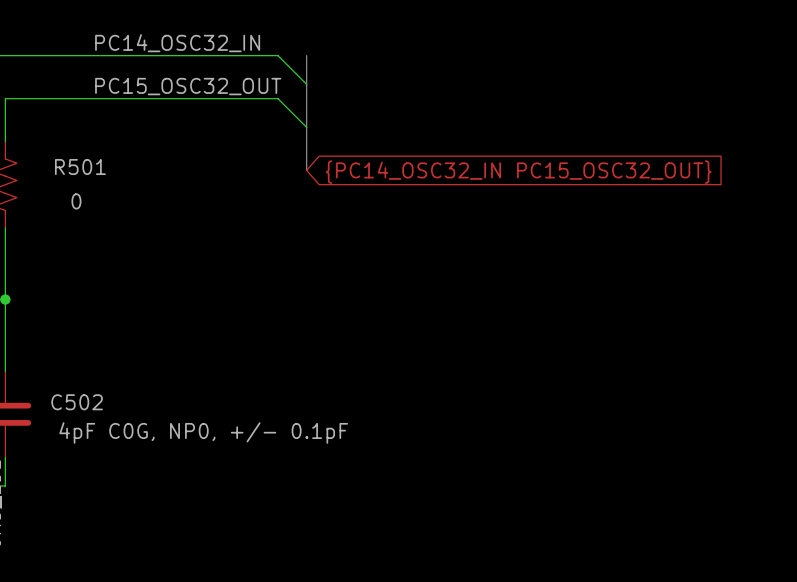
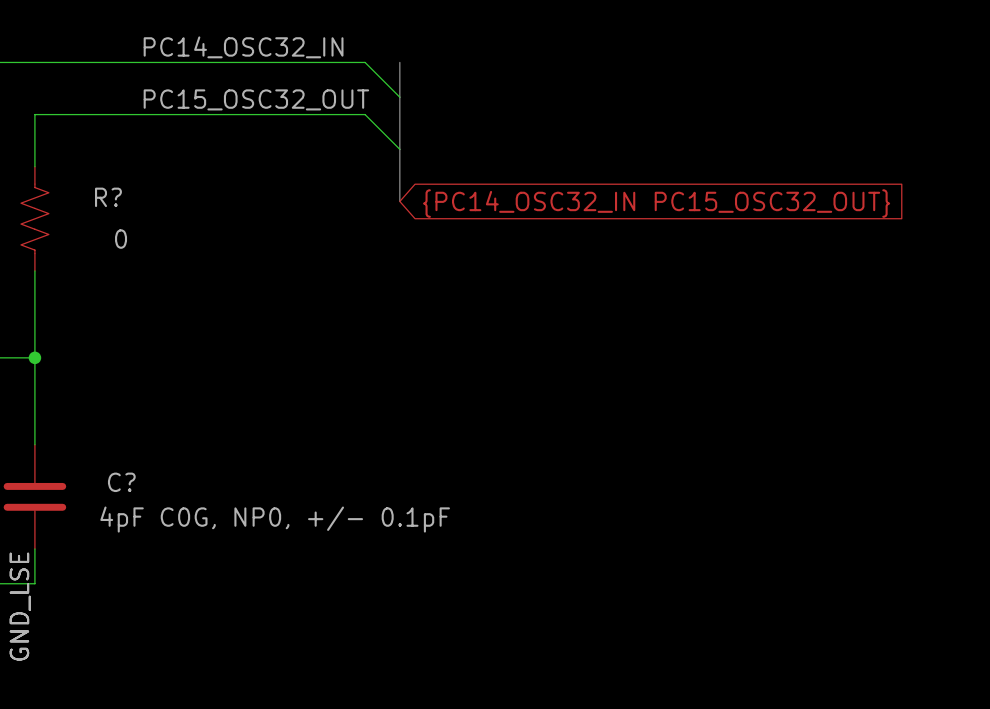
R501 name: R501 (80, 167) -> R? (108, 197)
C502 name: C502 (77, 402) -> C? (121, 482)

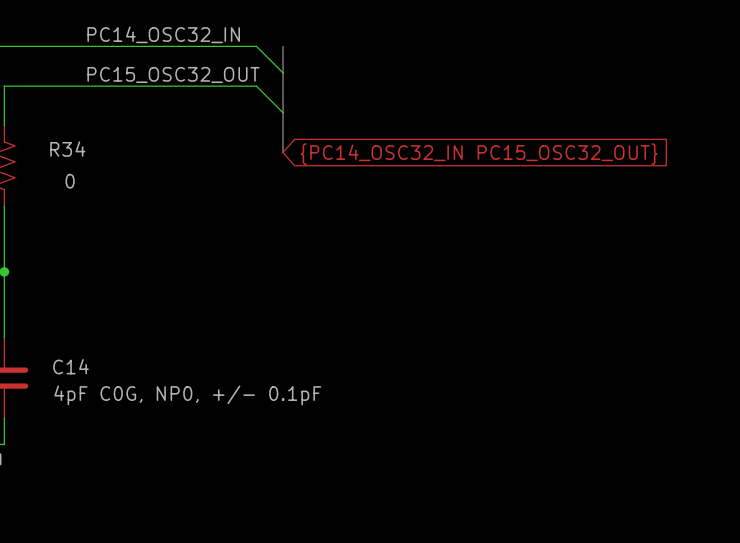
R? name: R? (108, 197) -> R34 (67, 149)
C? name: C? (121, 482) -> C14 (71, 366)

